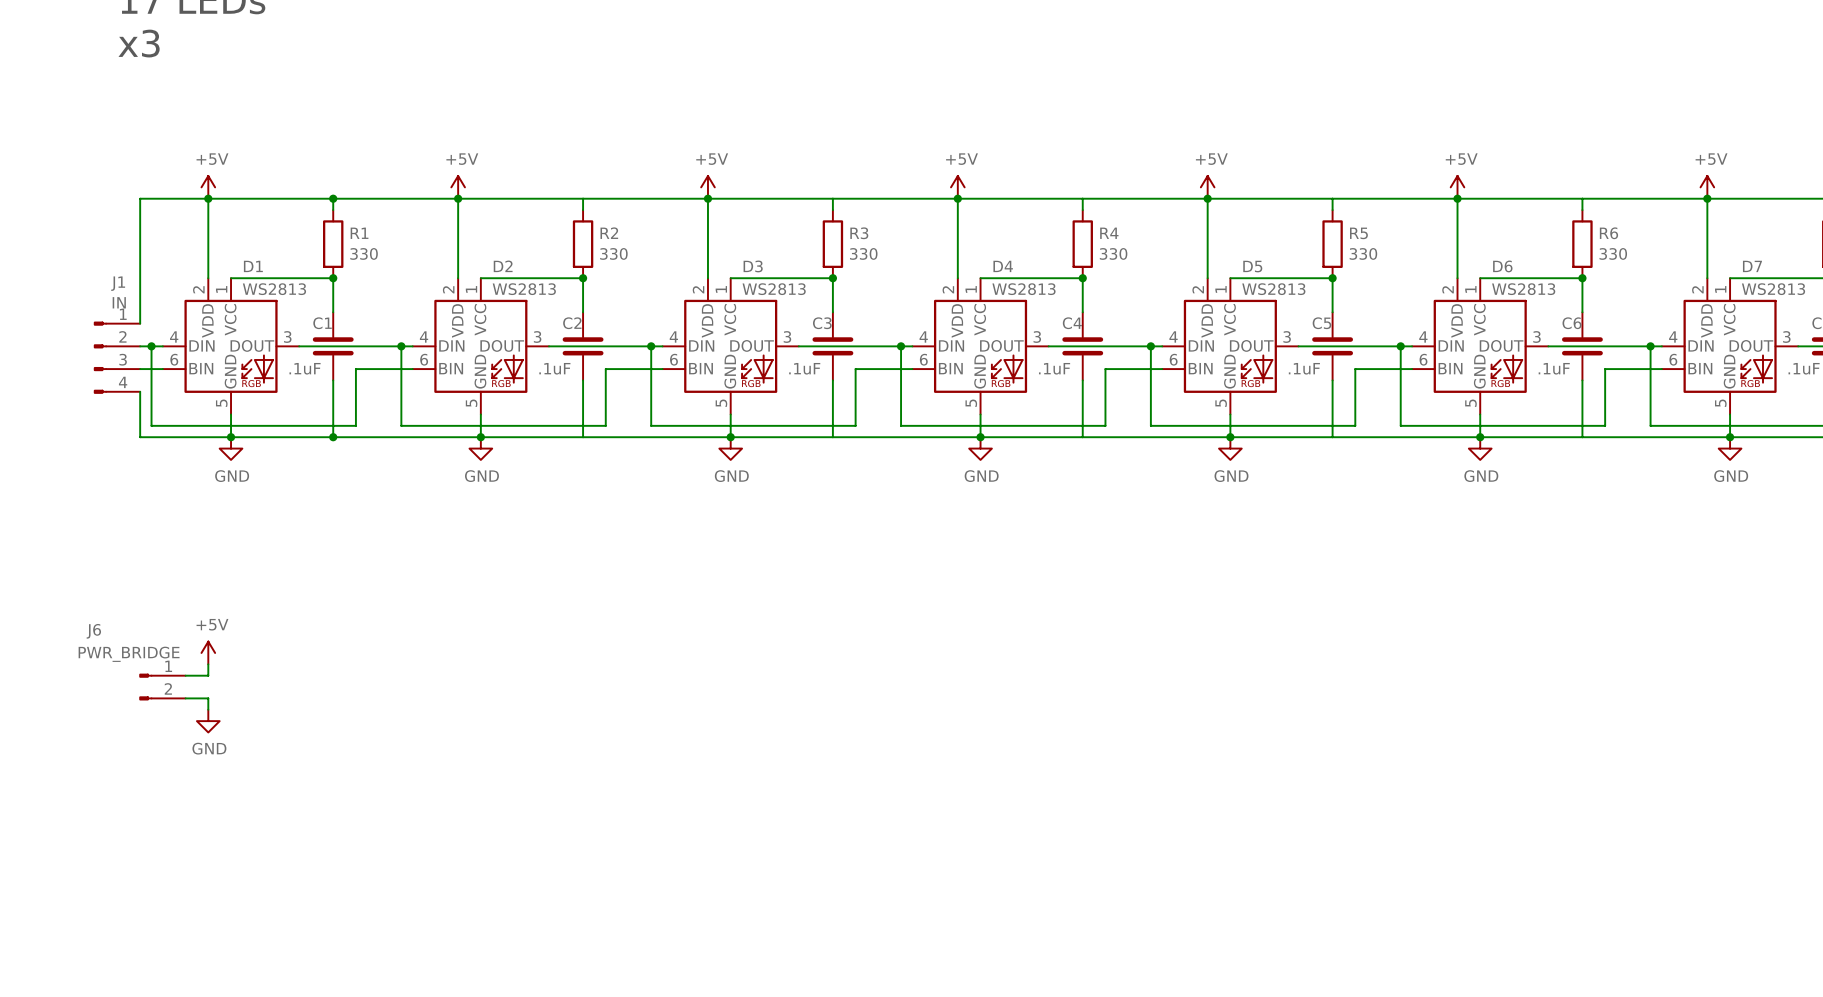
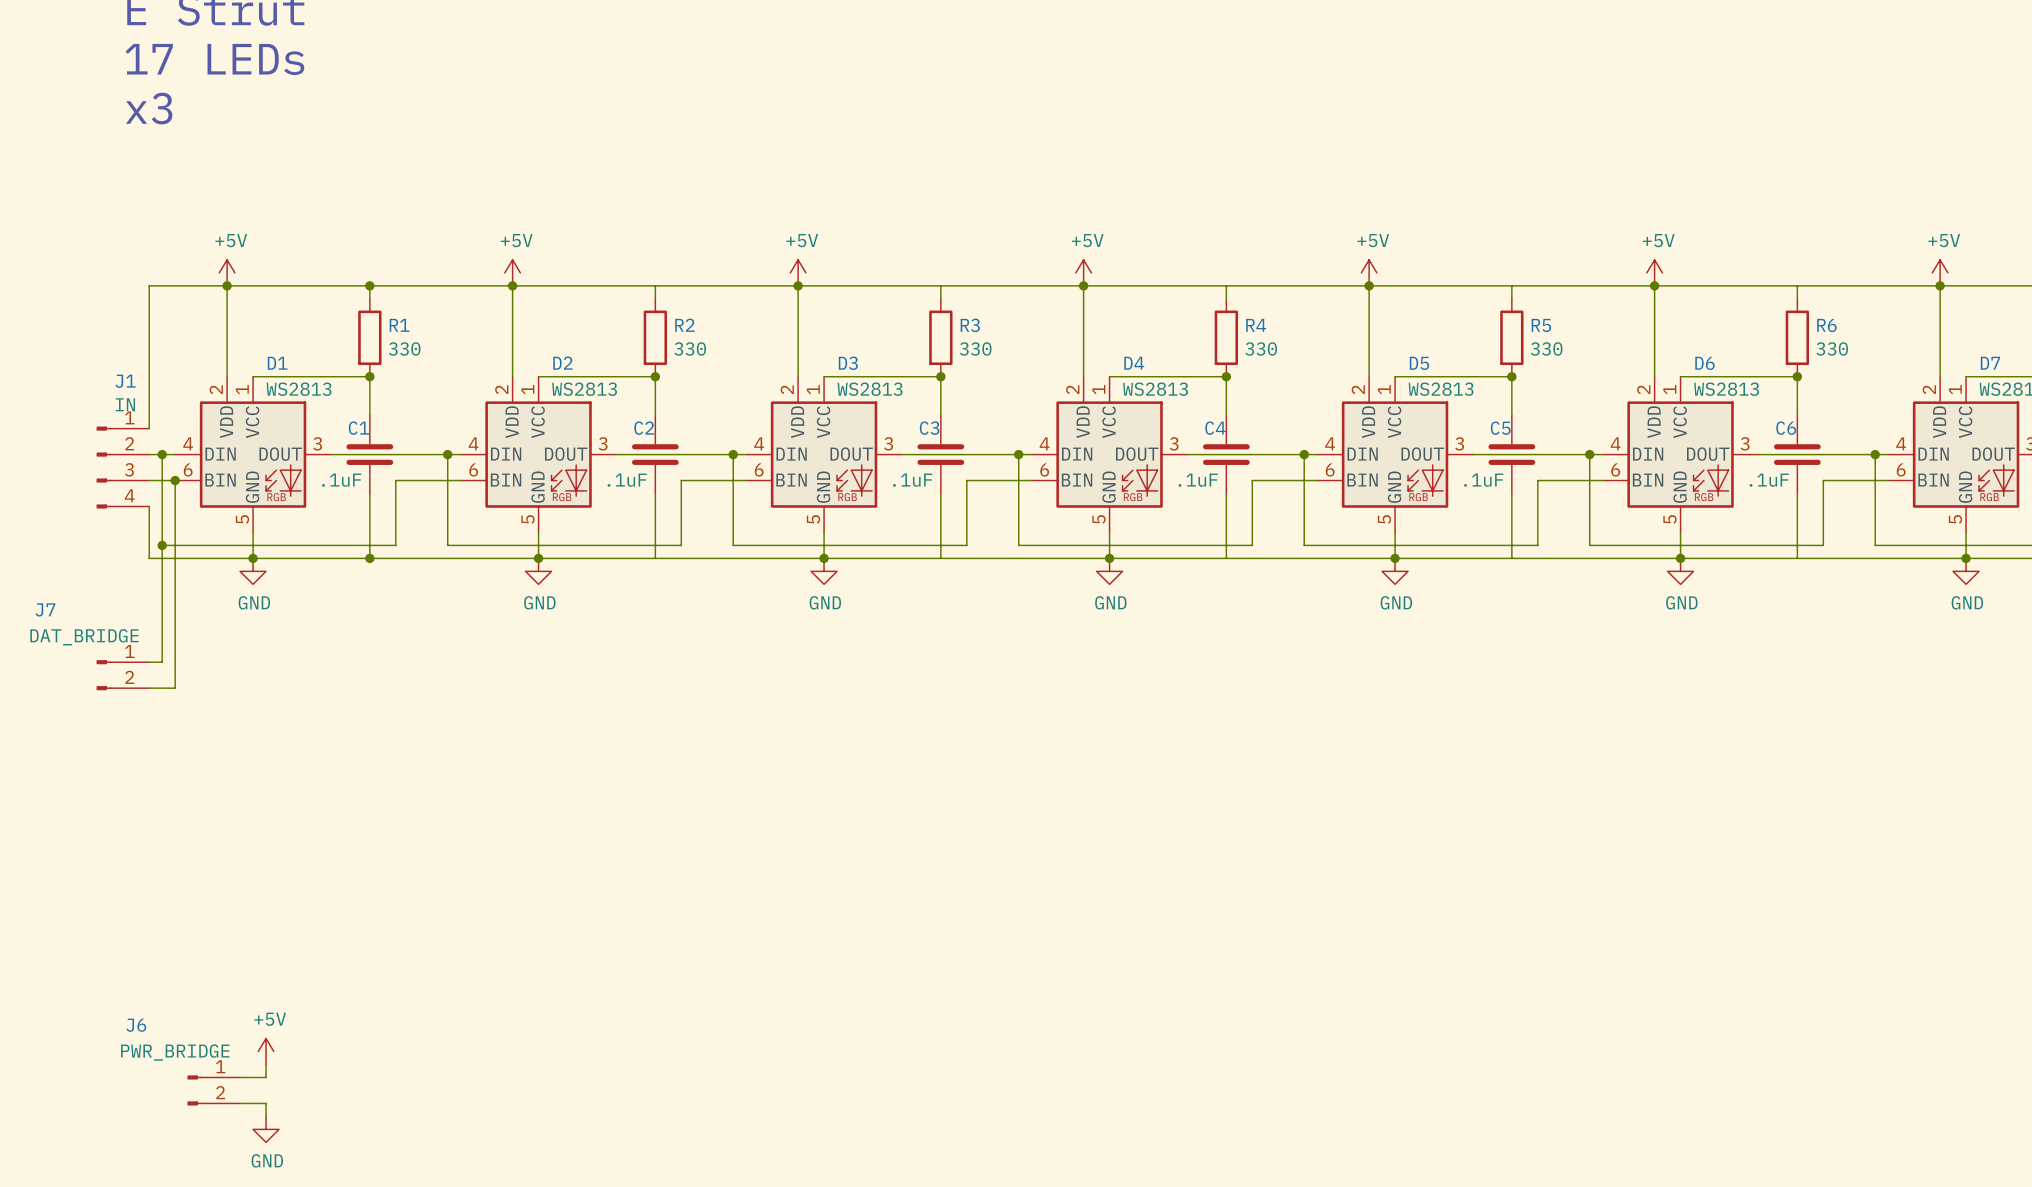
wire: none -> (175, 480) (175, 688) (149, 688)
junction: none -> (175, 480)
wire: none -> (162, 545) (162, 662) (149, 662)
junction: none -> (162, 545)
J7: none -> DAT_BRIDGE (122, 675)
power symbol position: +5V (208, 652) -> +5V (266, 1051)
wire: (208, 664) (208, 675) (185, 675) -> (266, 1064) (266, 1077) (240, 1077)
J6 position: (162, 687) -> (213, 1090)
wire: (185, 698) (208, 698) (208, 709) -> (240, 1103) (266, 1103) (266, 1116)
power symbol position: GND (208, 721) -> GND (266, 1129)

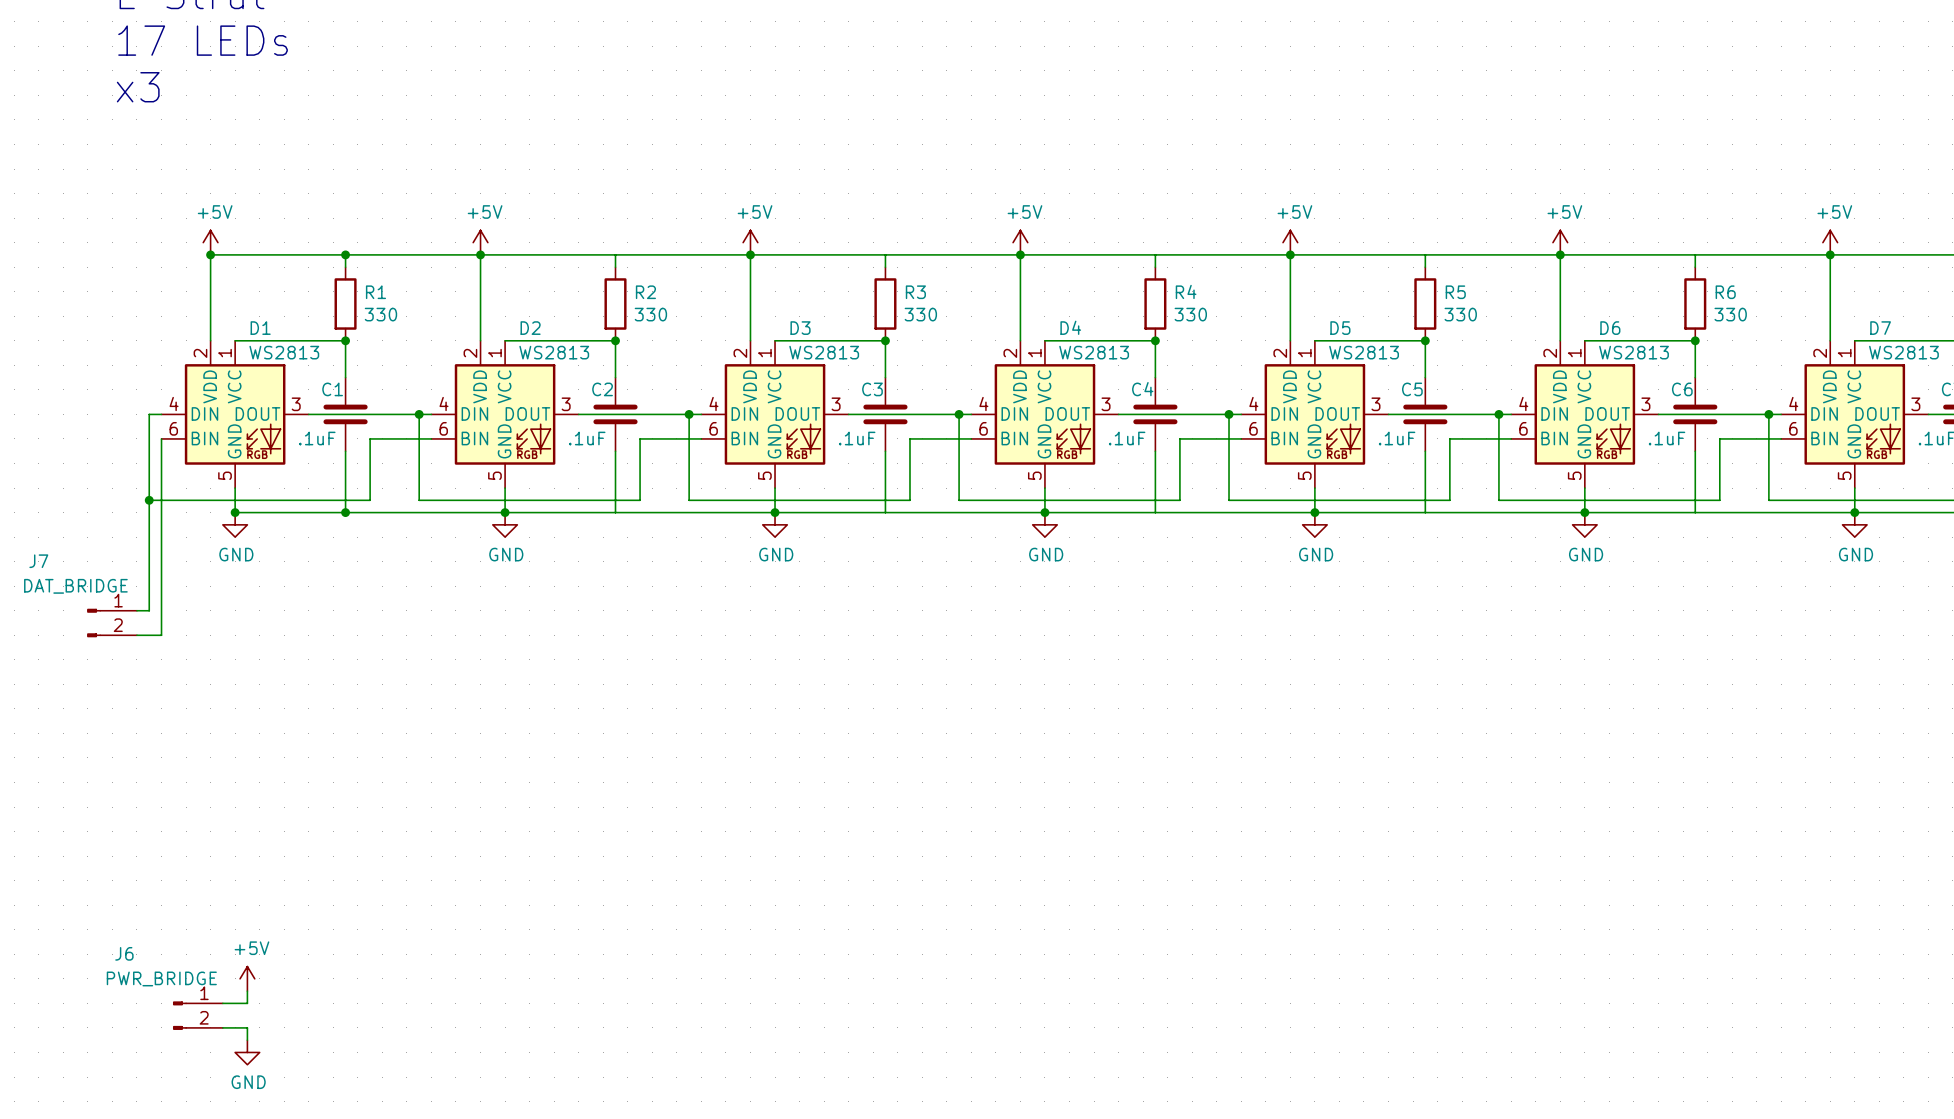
wire: (227, 285) (149, 285) (149, 428) -> none
wire: (149, 454) (162, 454) -> none
junction: (162, 454) -> none
J1: IN (122, 467) -> none
wire: (149, 480) (175, 480) -> none
junction: (175, 480) -> none
wire: (149, 506) (149, 558) (253, 558) -> none

